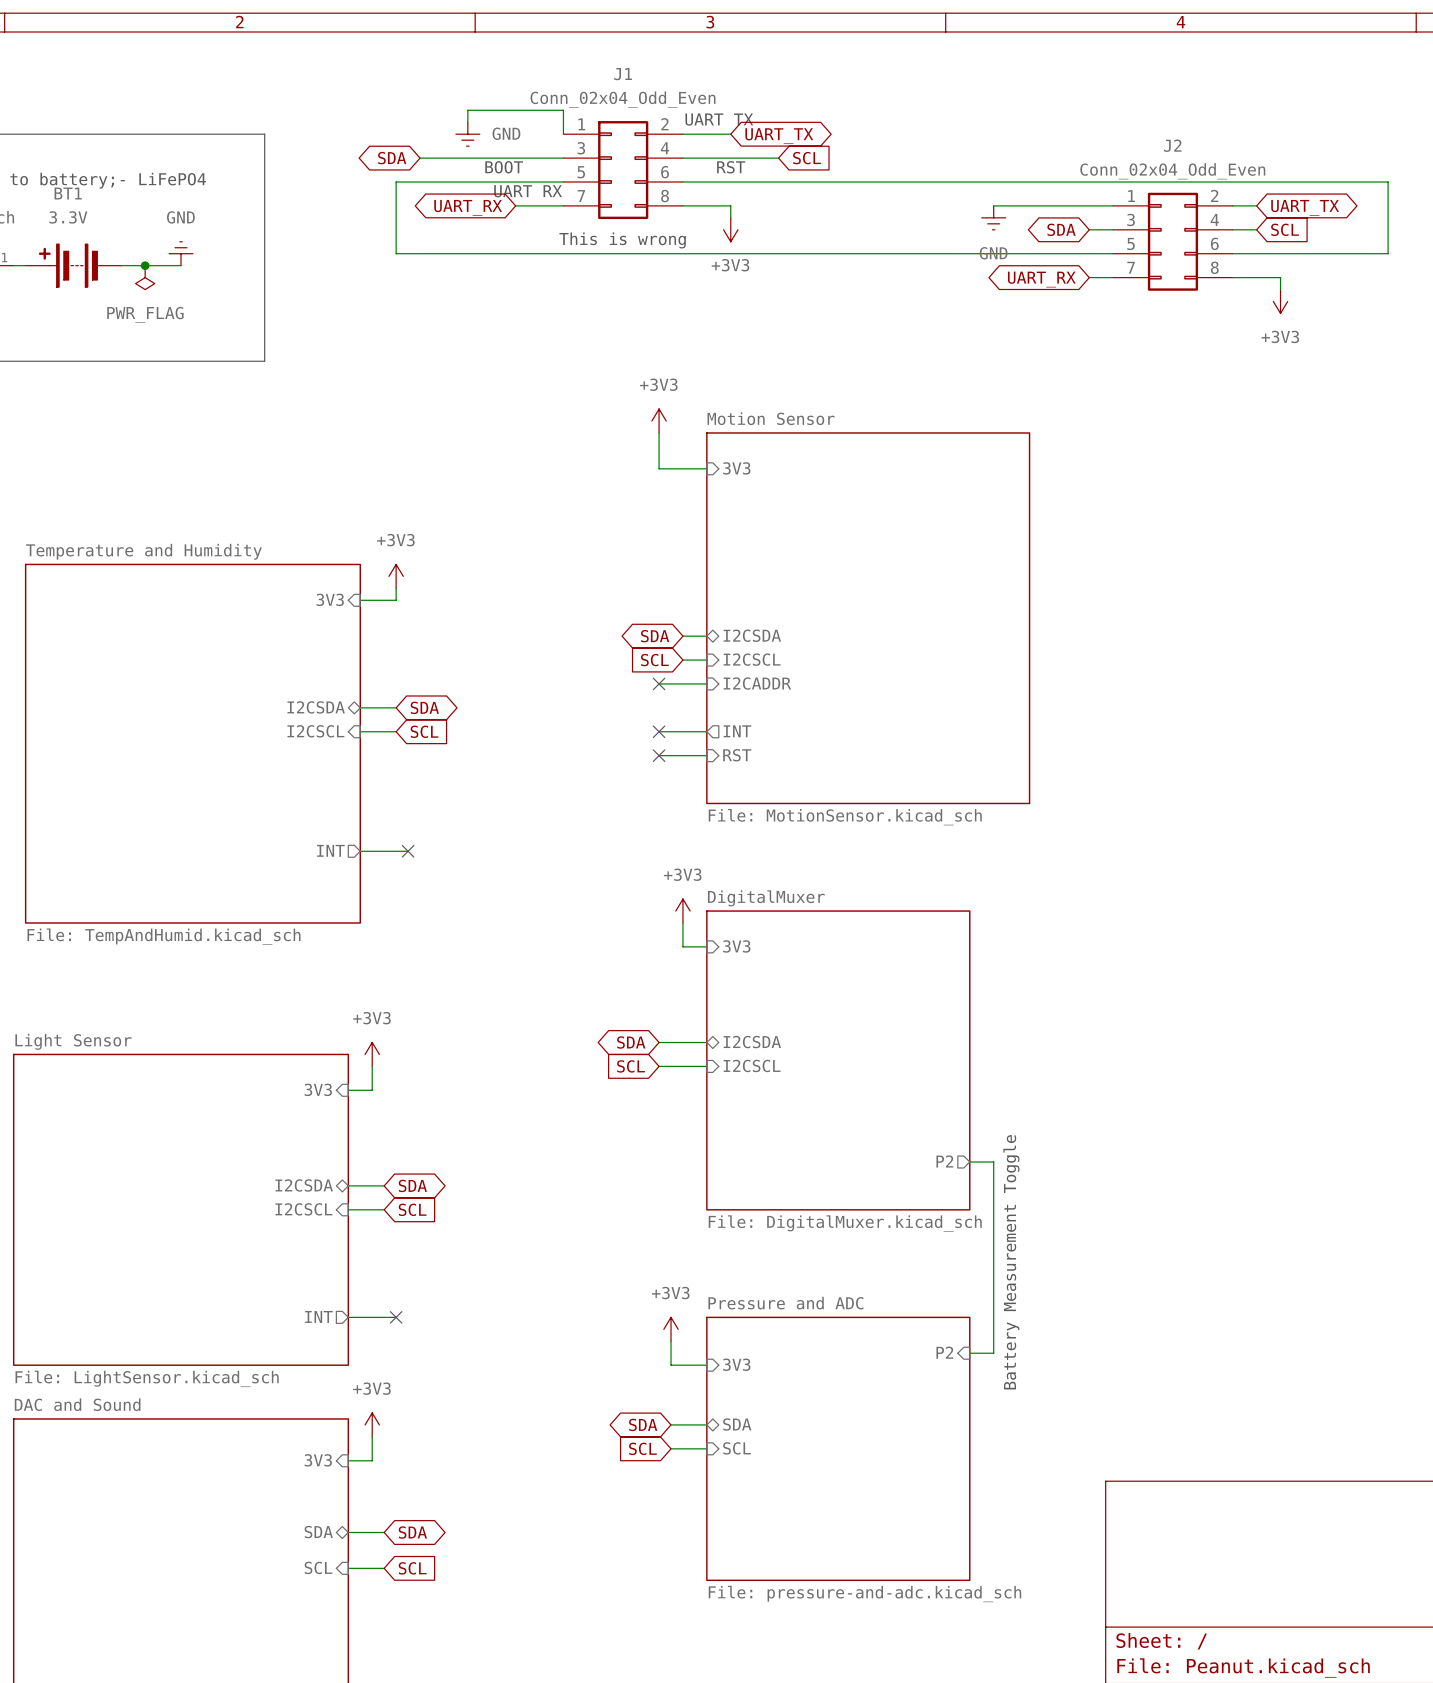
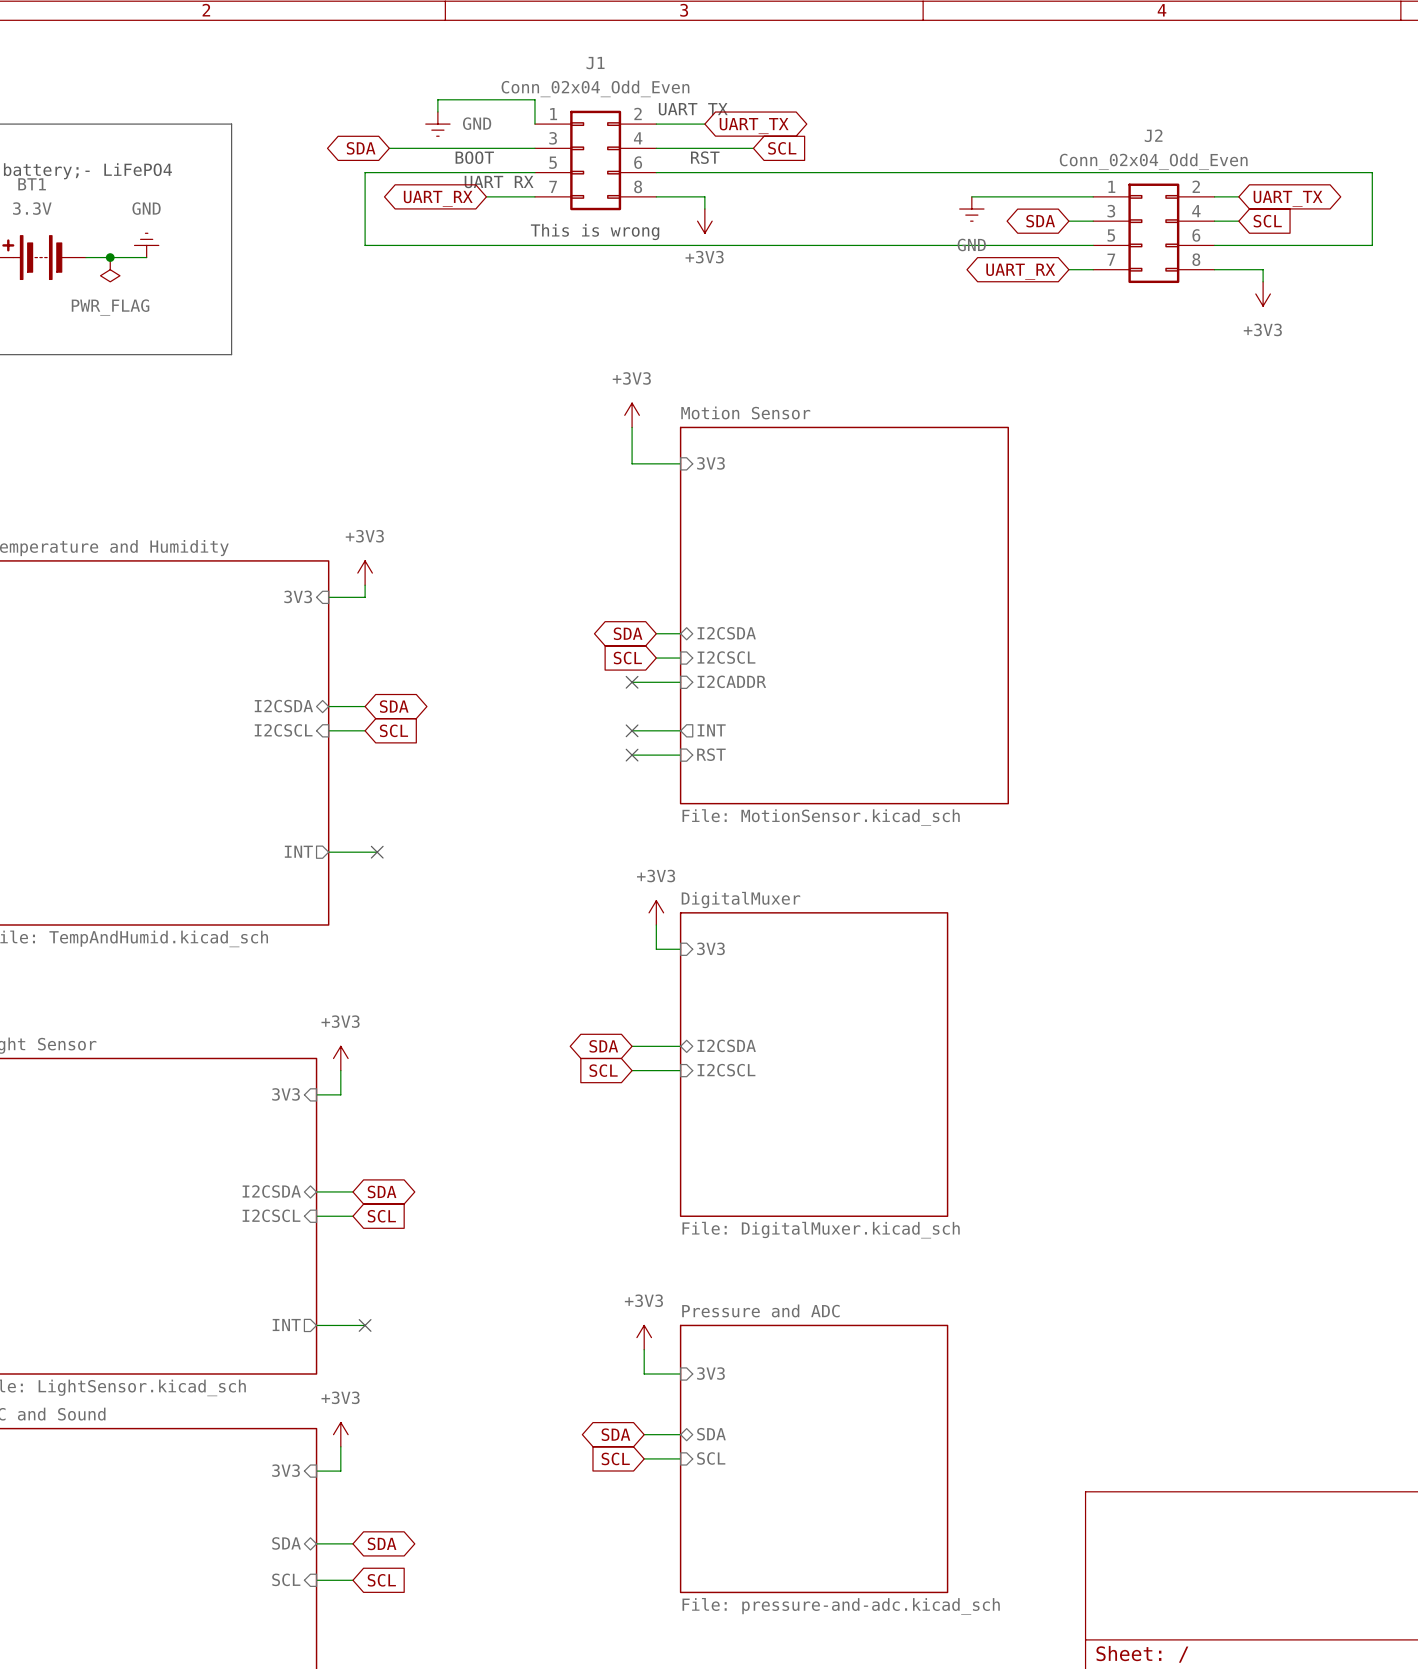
sheet pin: P2 (944, 1161) -> none
wire: (969, 1162) (993, 1162) (993, 1353) (969, 1353) -> none
text: Battery Measurement Toggle (1011, 1262) -> none
sheet pin: P2 (944, 1352) -> none

